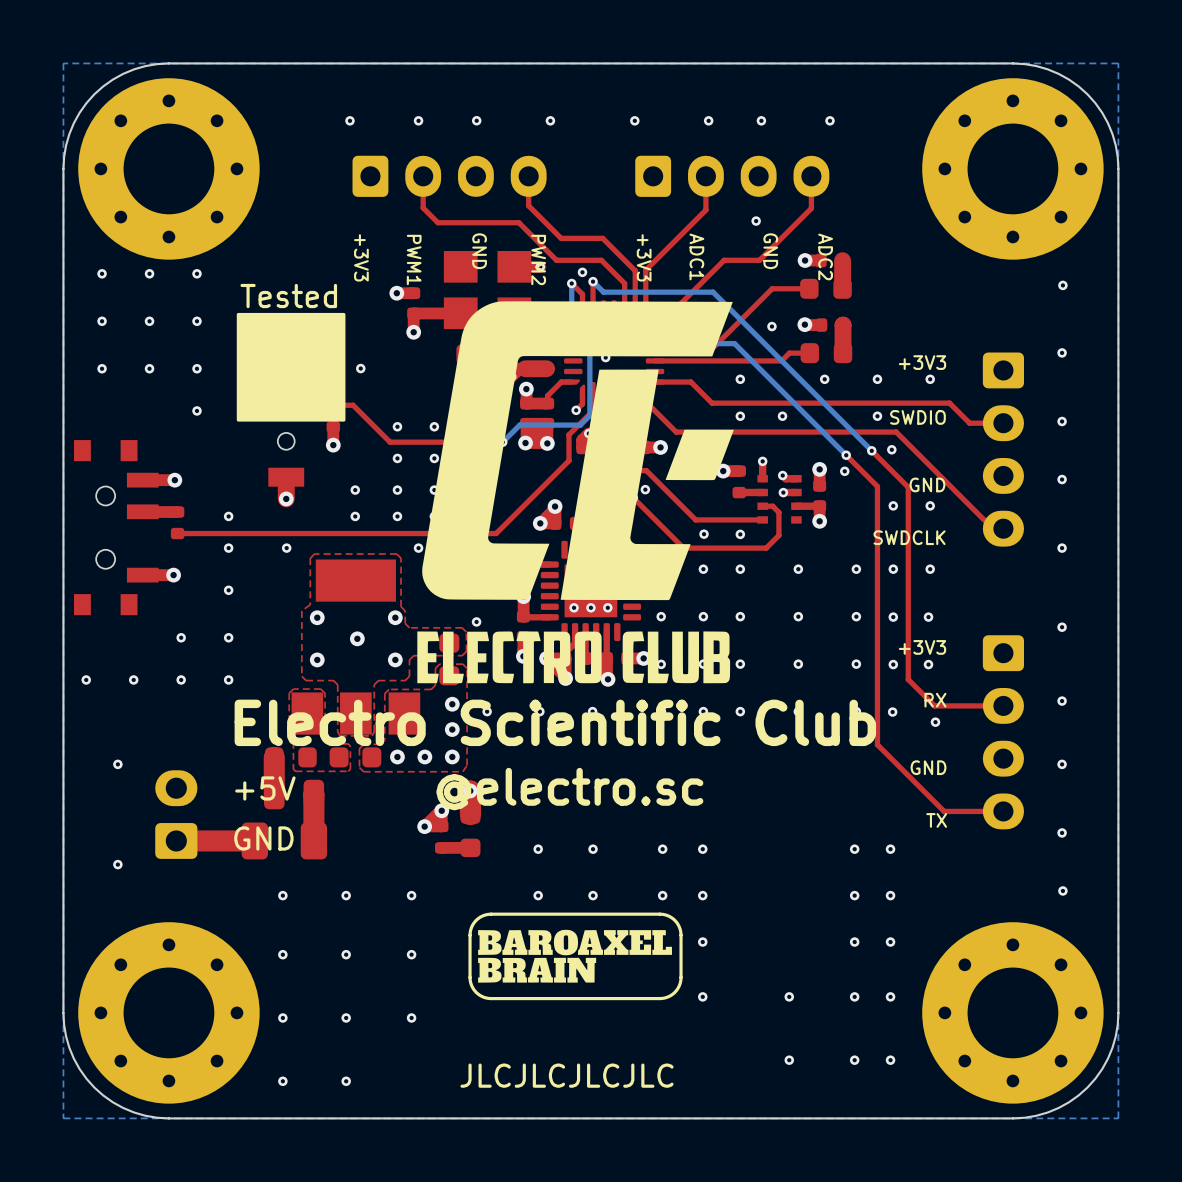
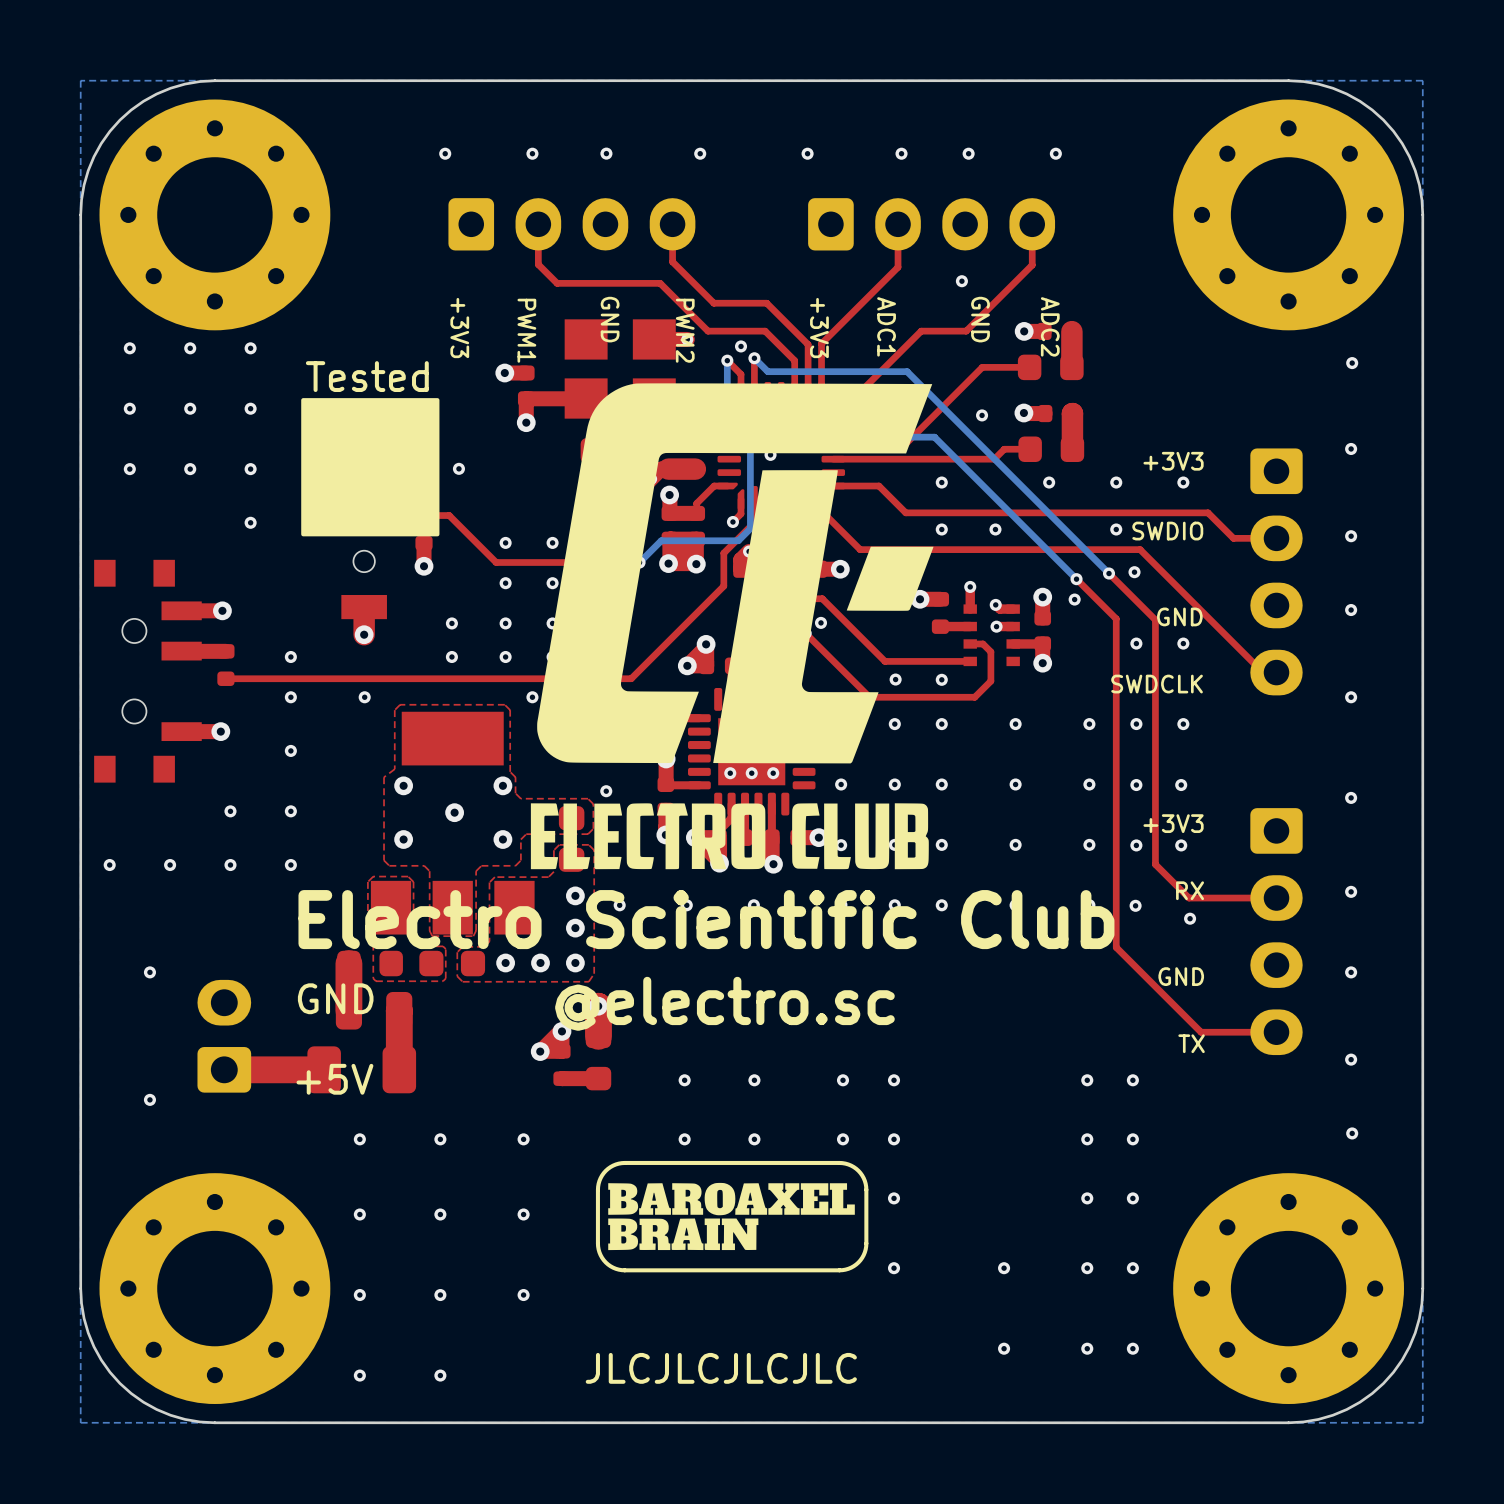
text position: +5V (265, 788) -> +5V (334, 1079)
text position: GND (263, 838) -> GND (335, 998)

